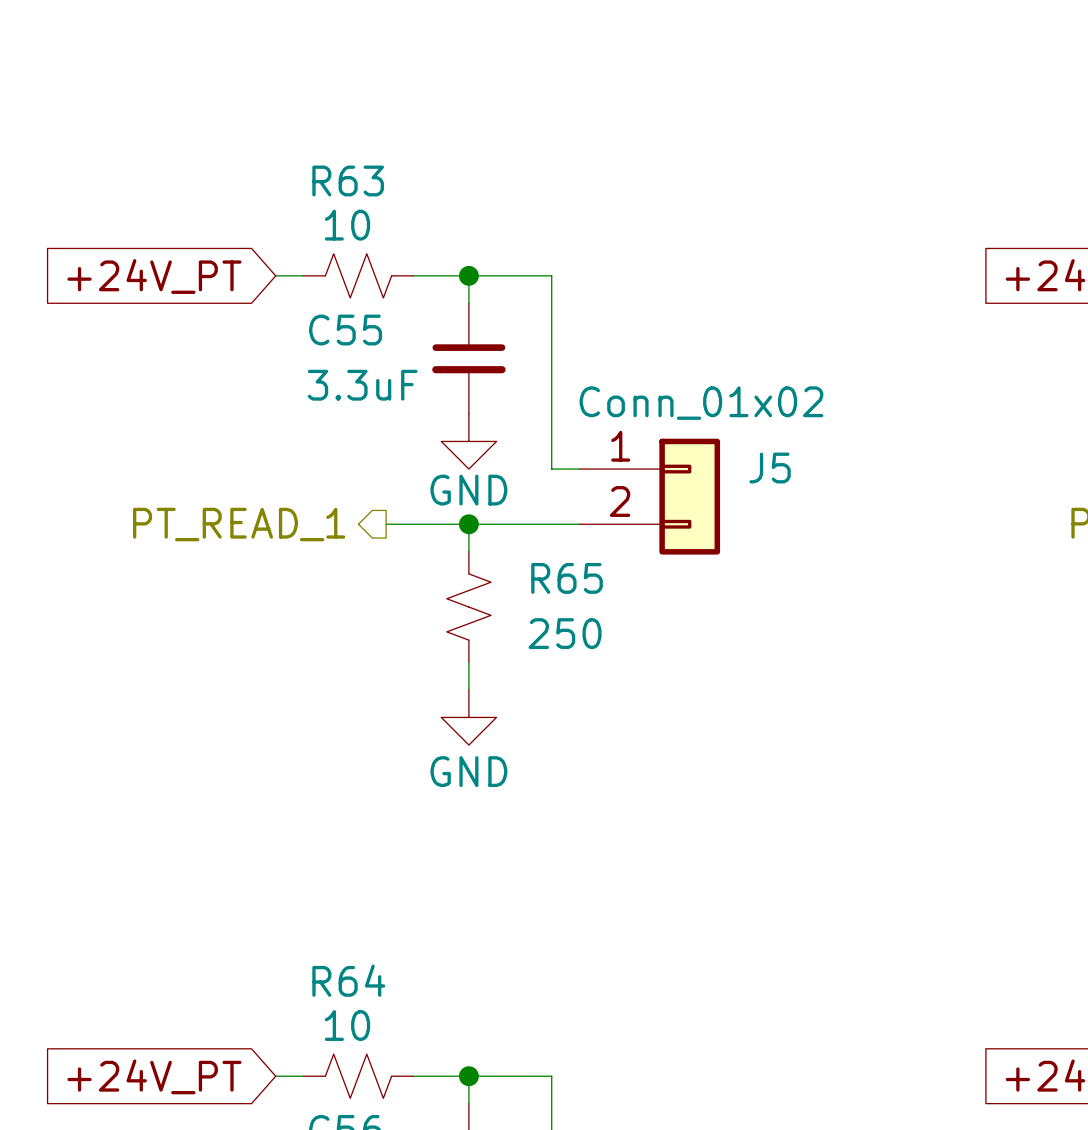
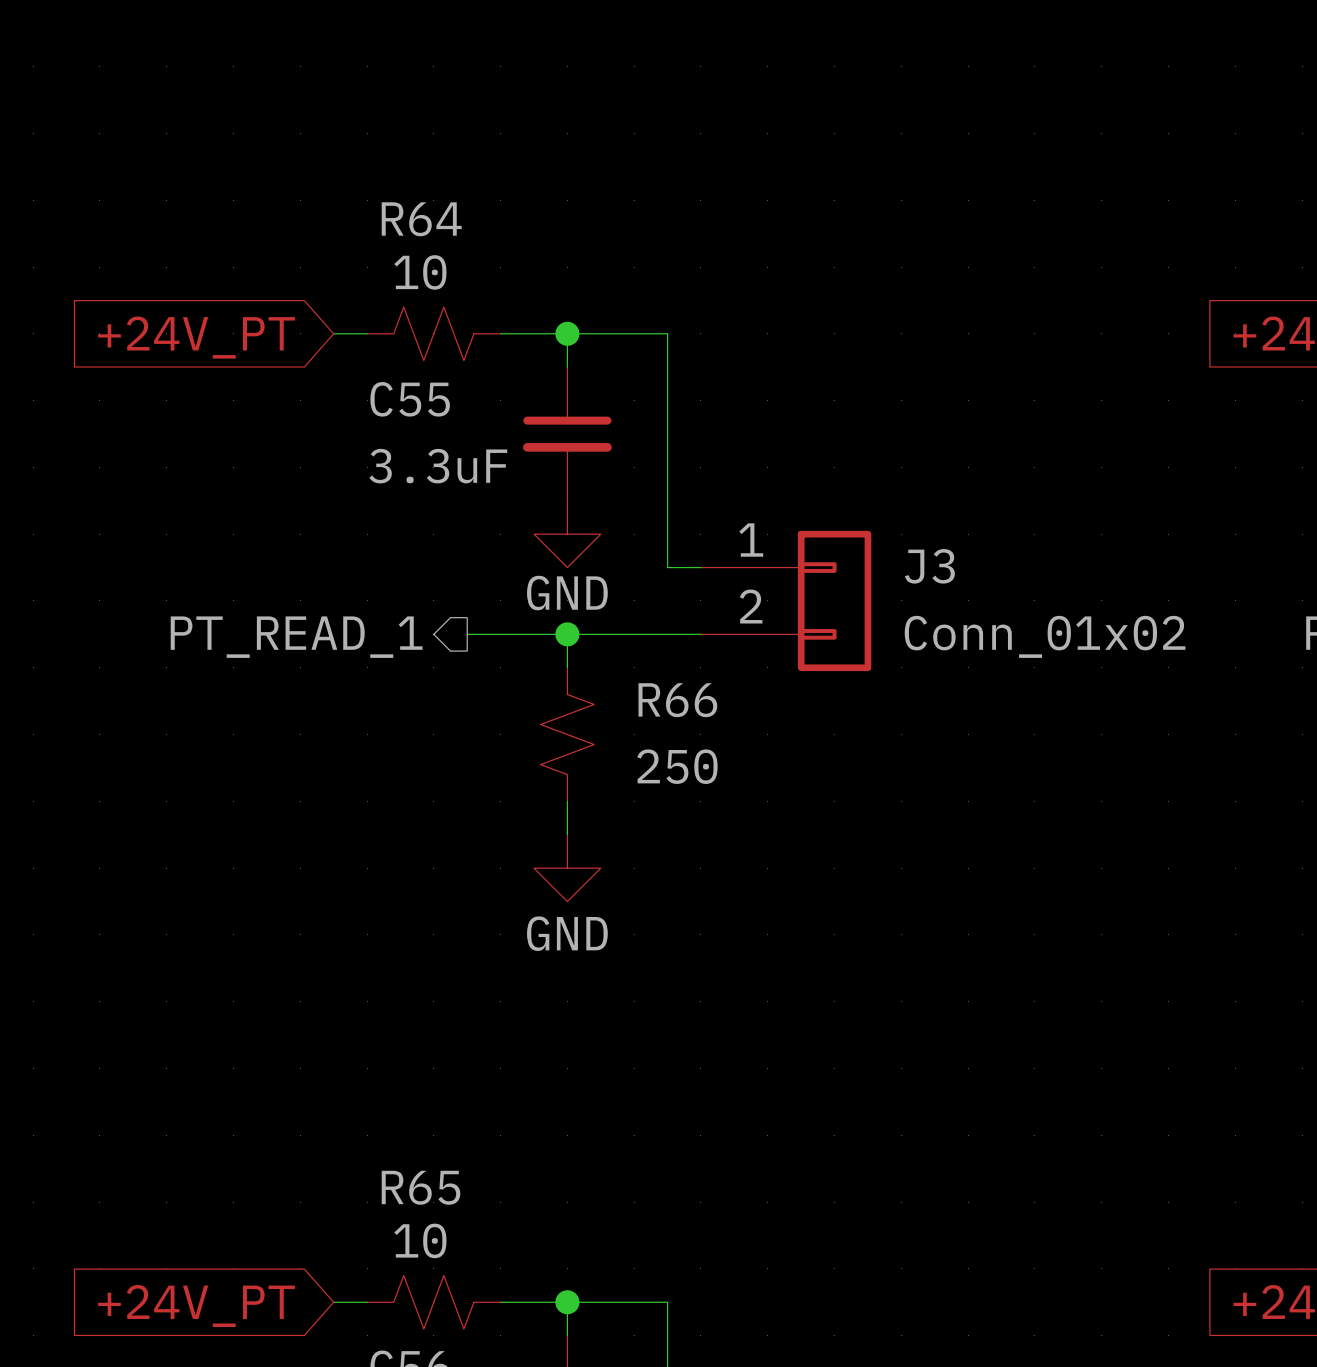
R63 name: R63 (348, 180) -> R64 (421, 219)
J5 value position: Conn_01x02 (701, 403) -> Conn_01x02 (1045, 636)
J5 name: J5 (770, 468) -> J3 (929, 566)
R65 name: R65 (567, 578) -> R66 (677, 700)
R64 name: R64 (348, 980) -> R65 (421, 1187)

